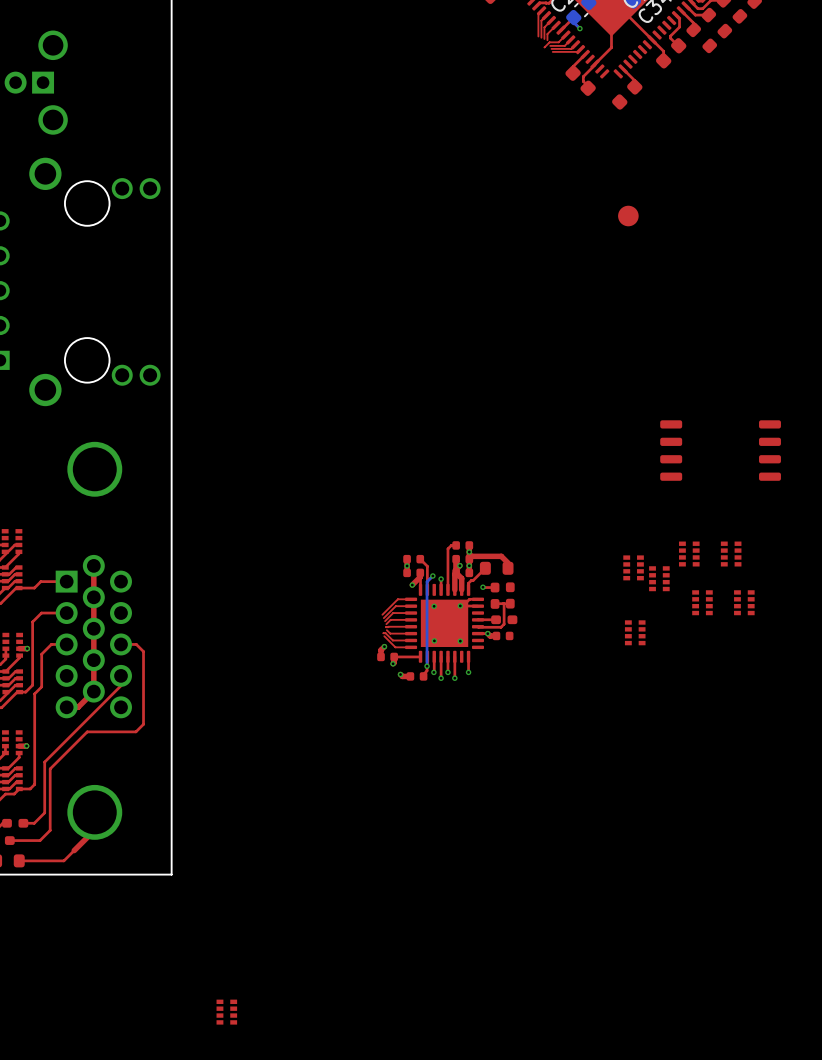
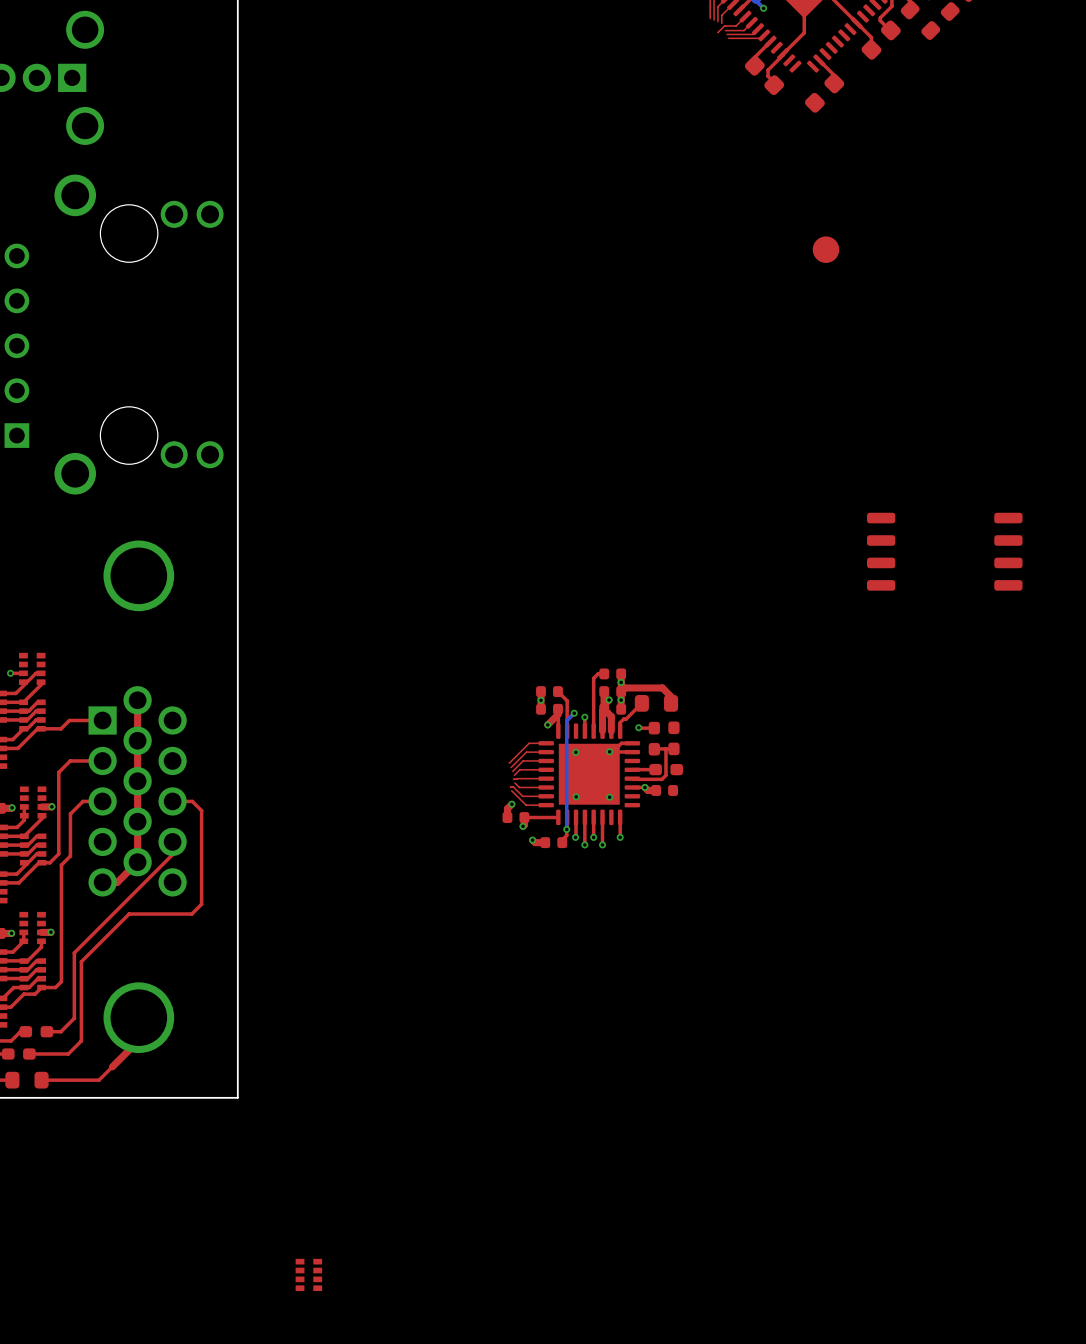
part: (689, 554) -> none
part: (731, 554) -> none
part: (633, 567) -> none
part: (659, 578) -> none
part: (702, 602) -> none
part: (744, 602) -> none
part: (635, 632) -> none

